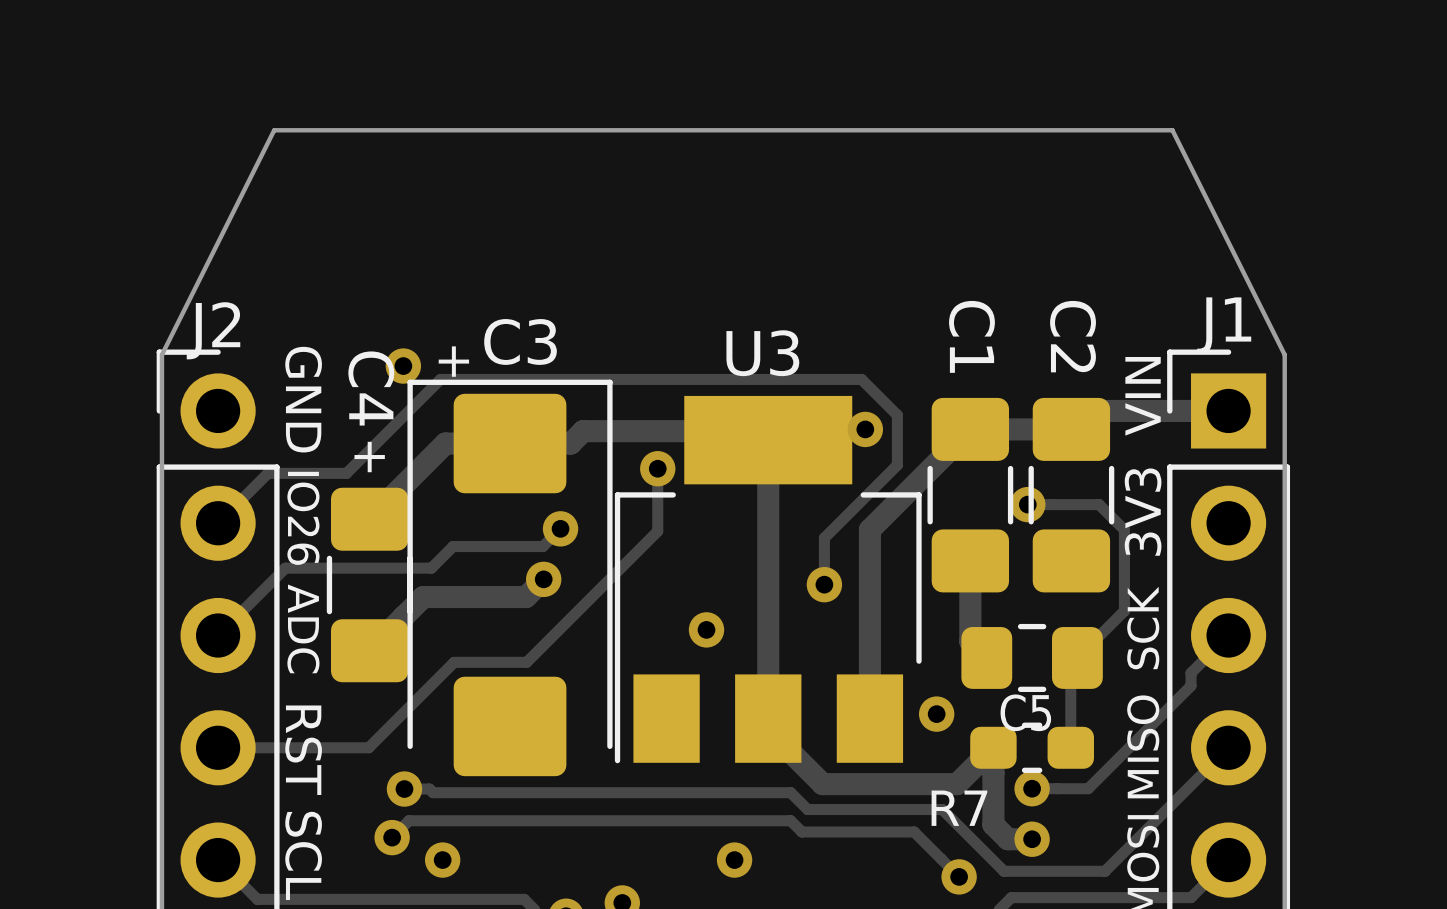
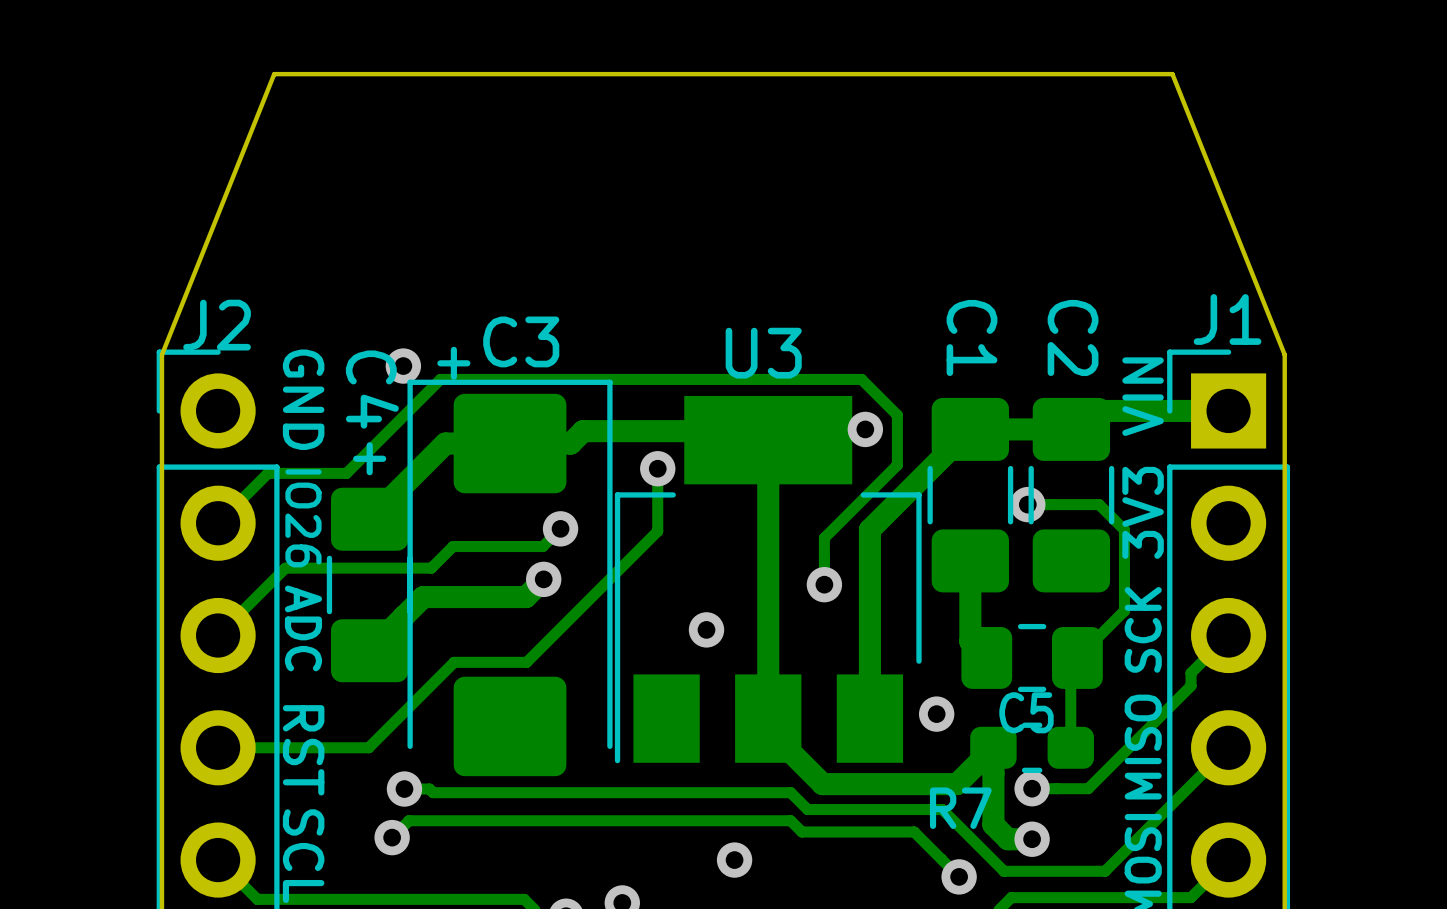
board edge: (1284, 354) (1172, 130) (274, 130) (161, 354) -> (1284, 354) (1172, 74) (274, 74) (161, 354)
via: (442, 860) -> none

